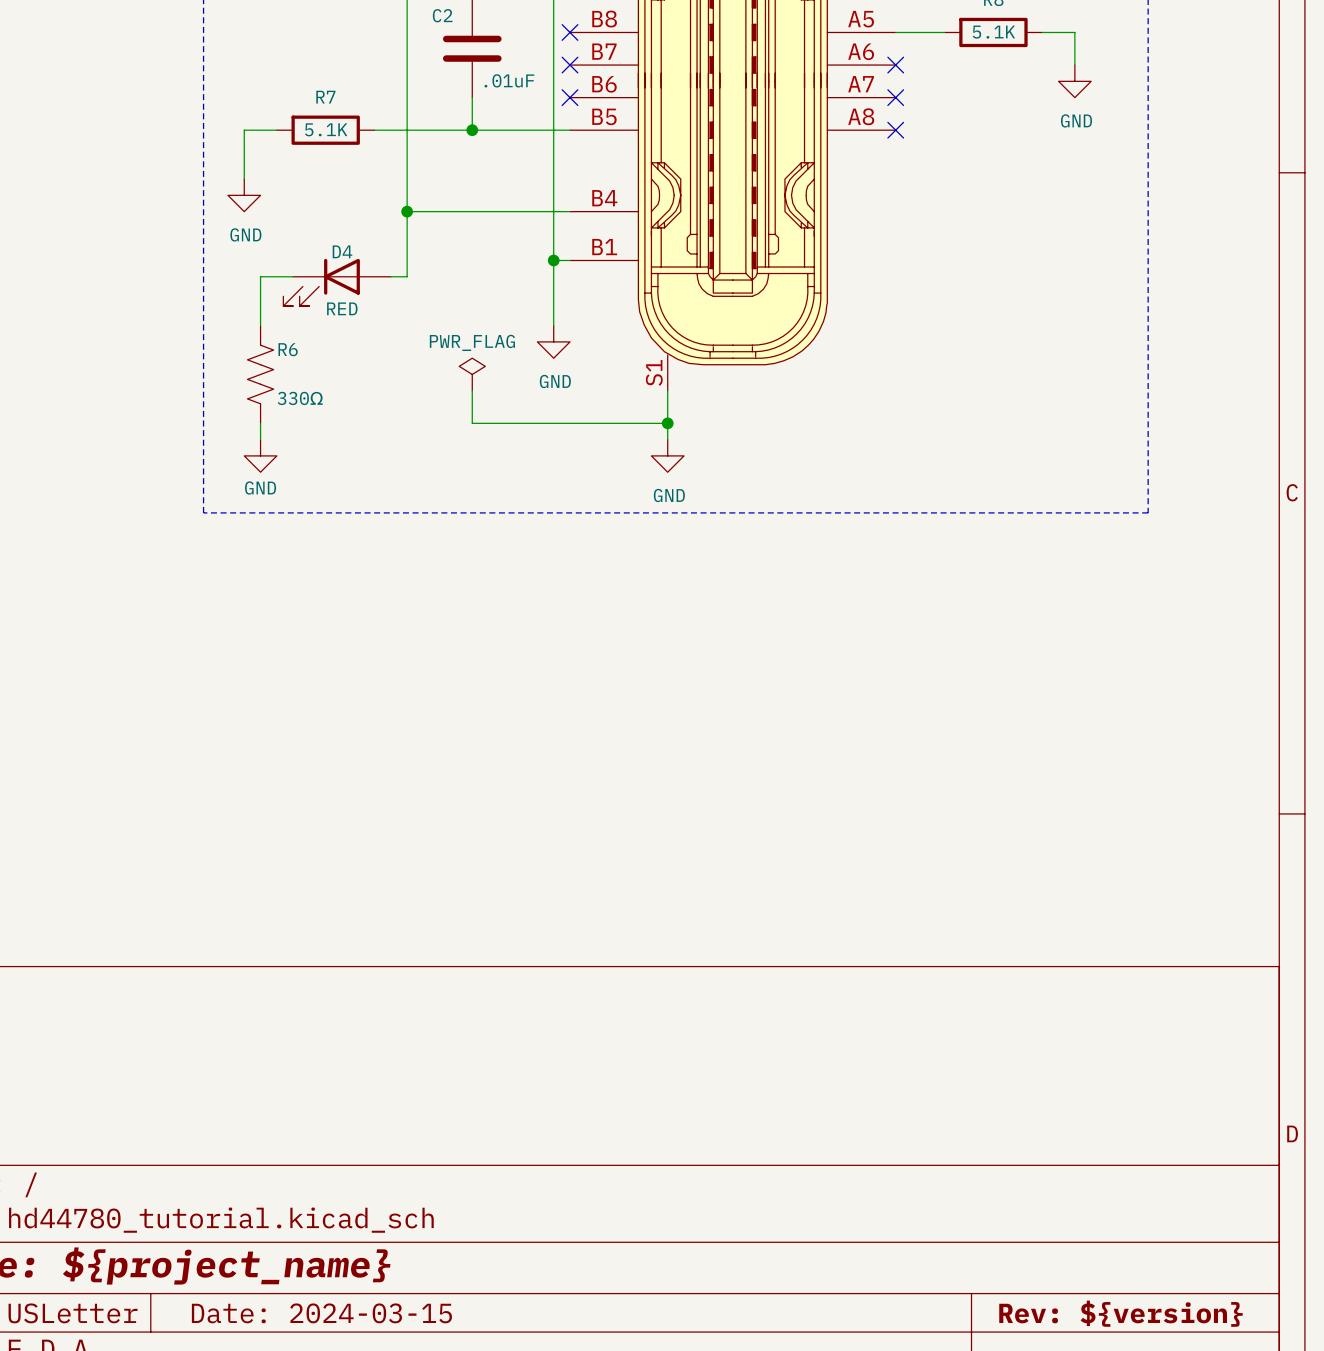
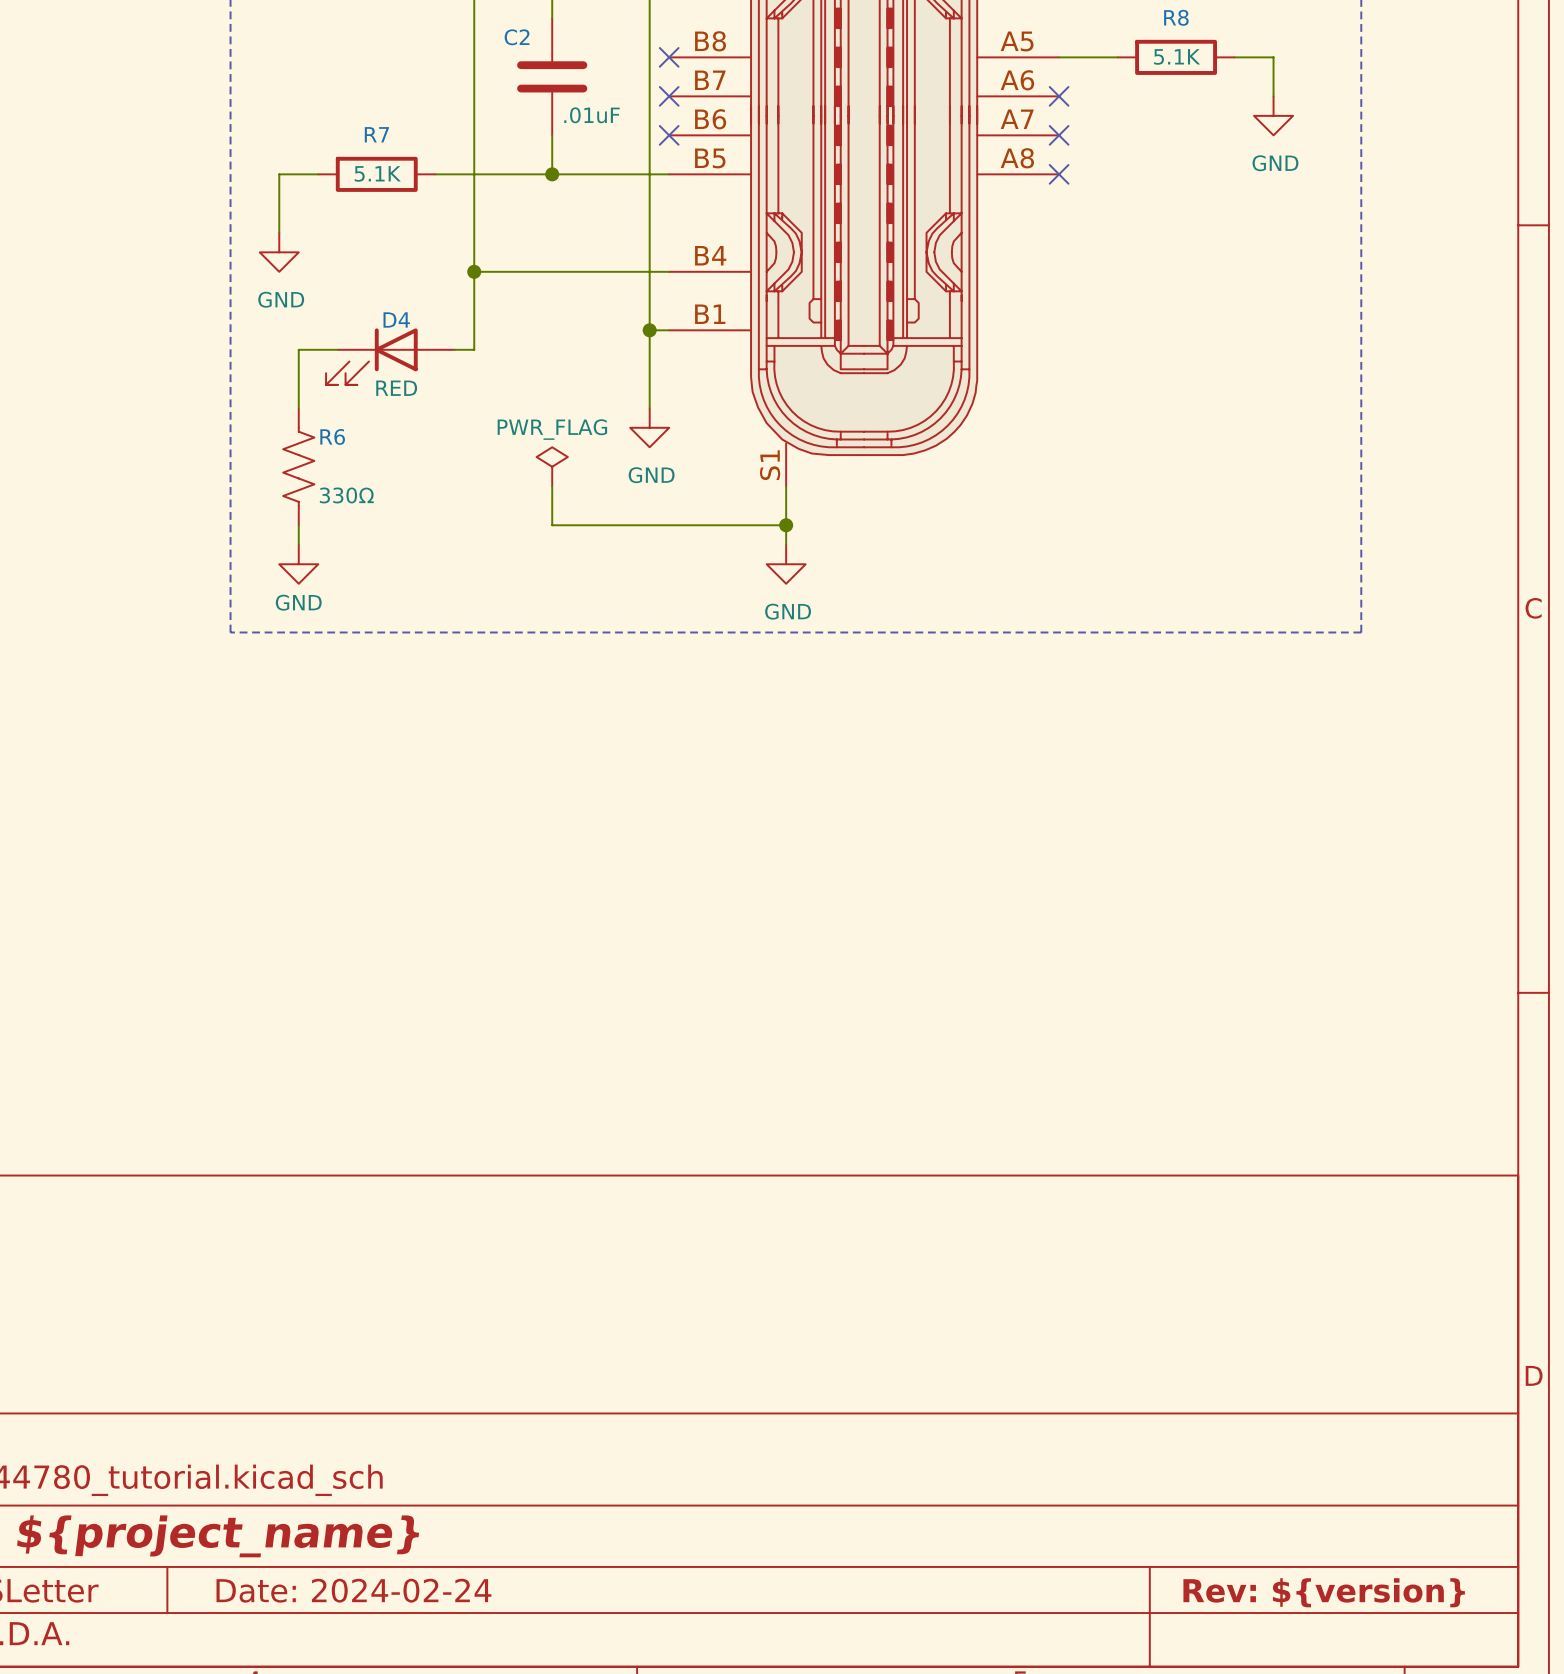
title block: Date: 2024-03-15 (321, 1313) -> Date: 2024-02-24 (353, 1590)

